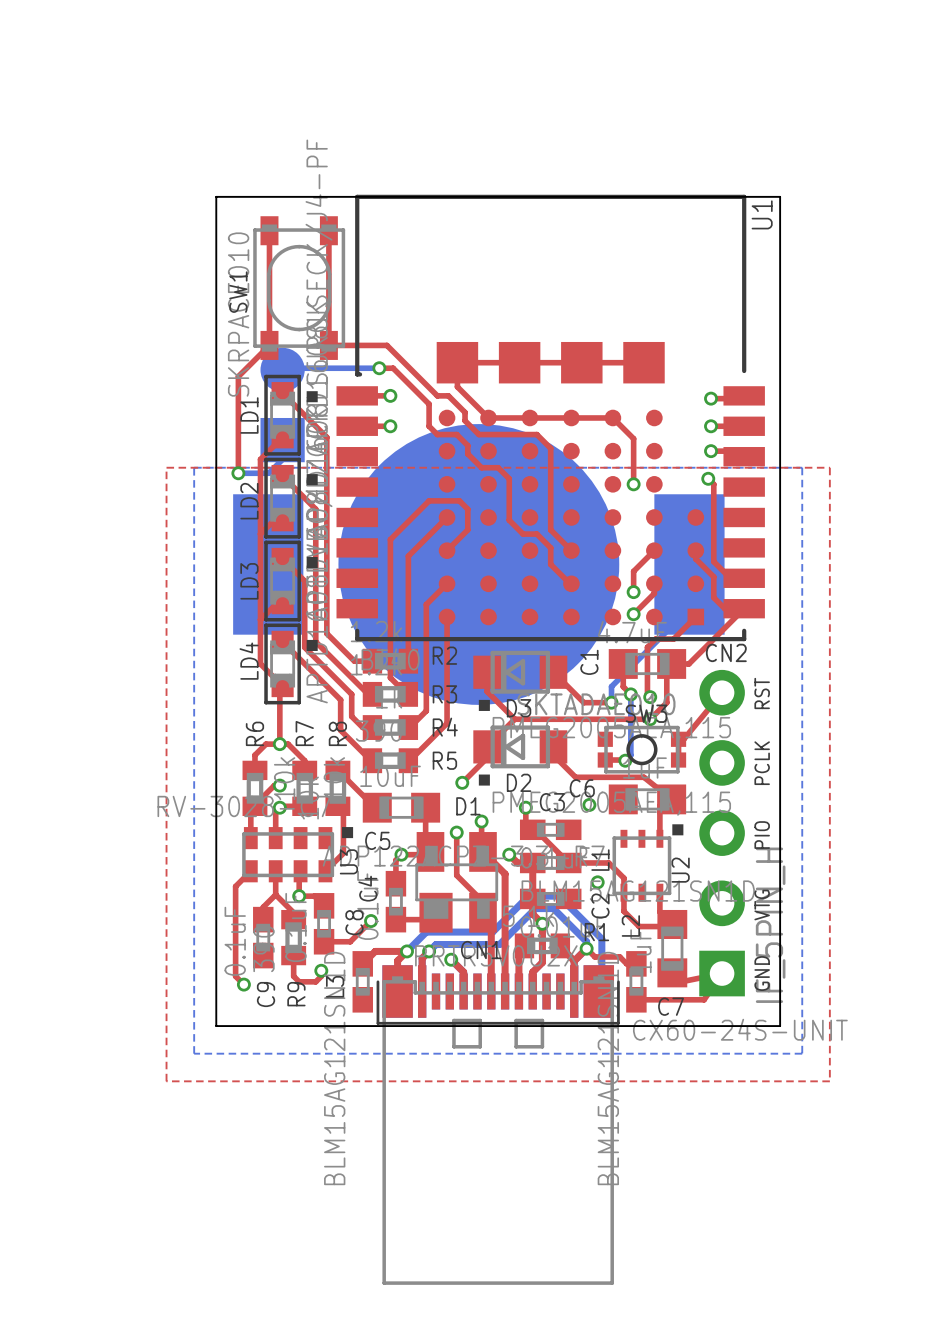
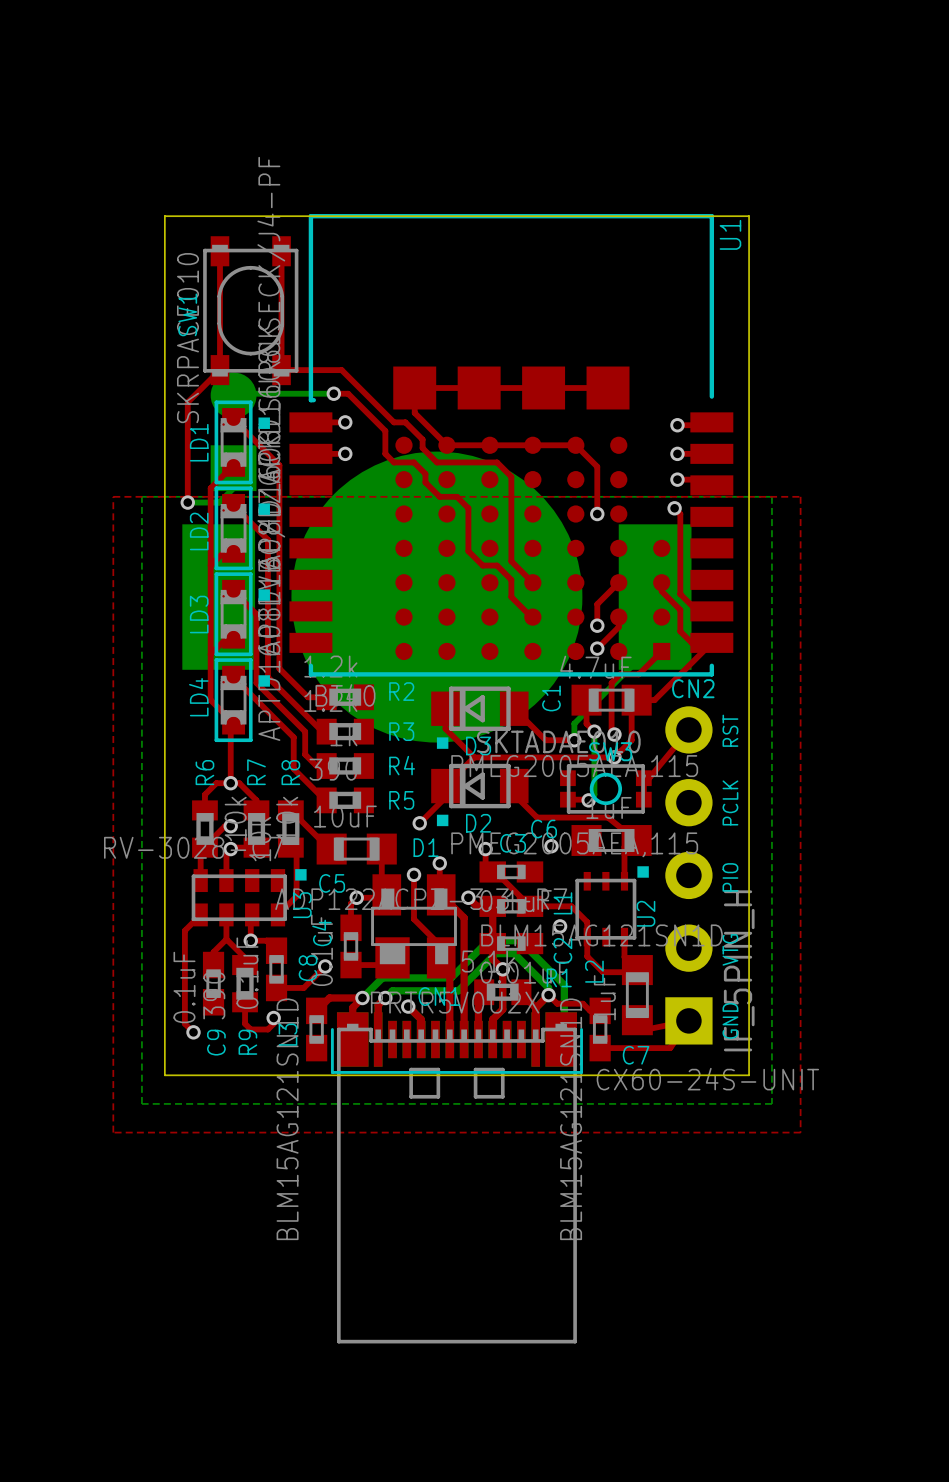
top track: (447, 517) (408, 556) (408, 661) -> none
top track: (447, 550) (467, 529) (467, 509) (459, 500) (429, 500) (390, 539) (390, 677) (406, 694) (409, 694) -> none
top track: (447, 579) (447, 583) (426, 604) (426, 710) (408, 727) -> none
top track: (447, 616) (447, 723) (408, 760) -> none

